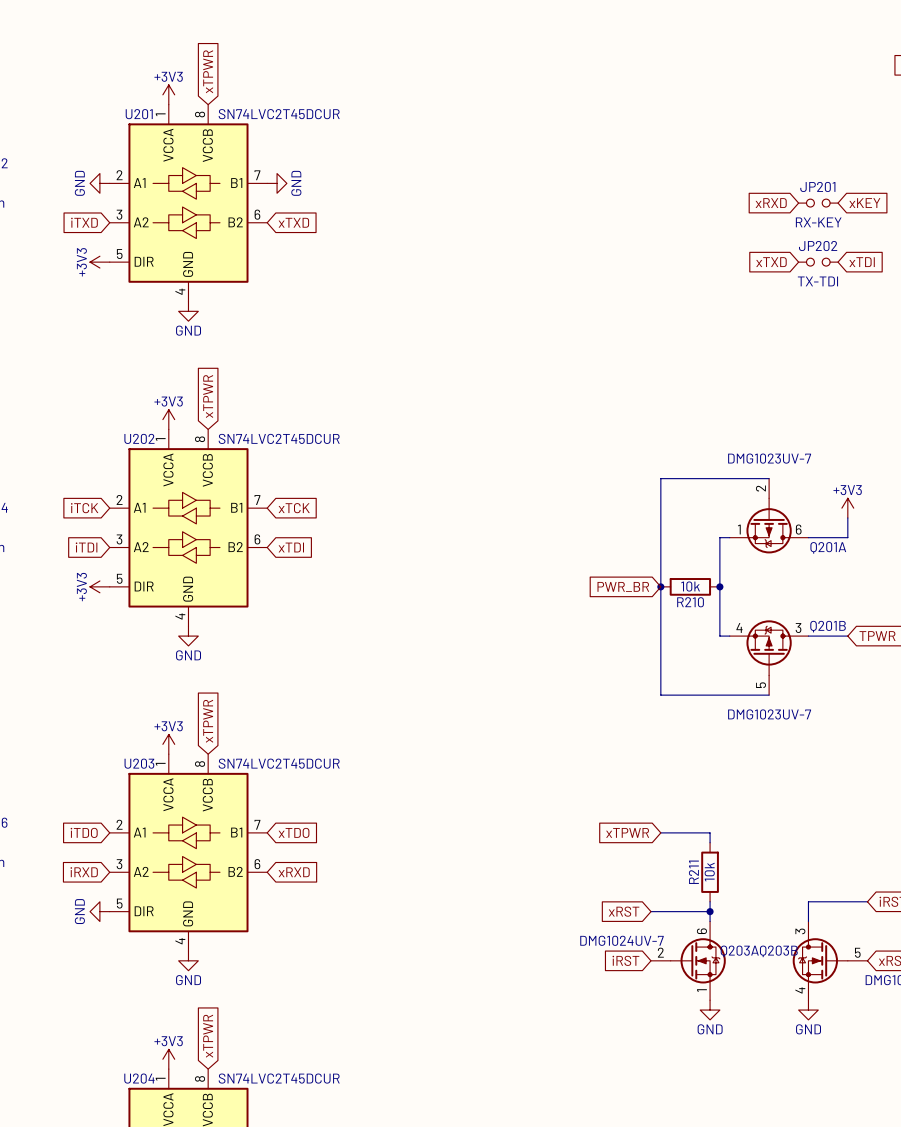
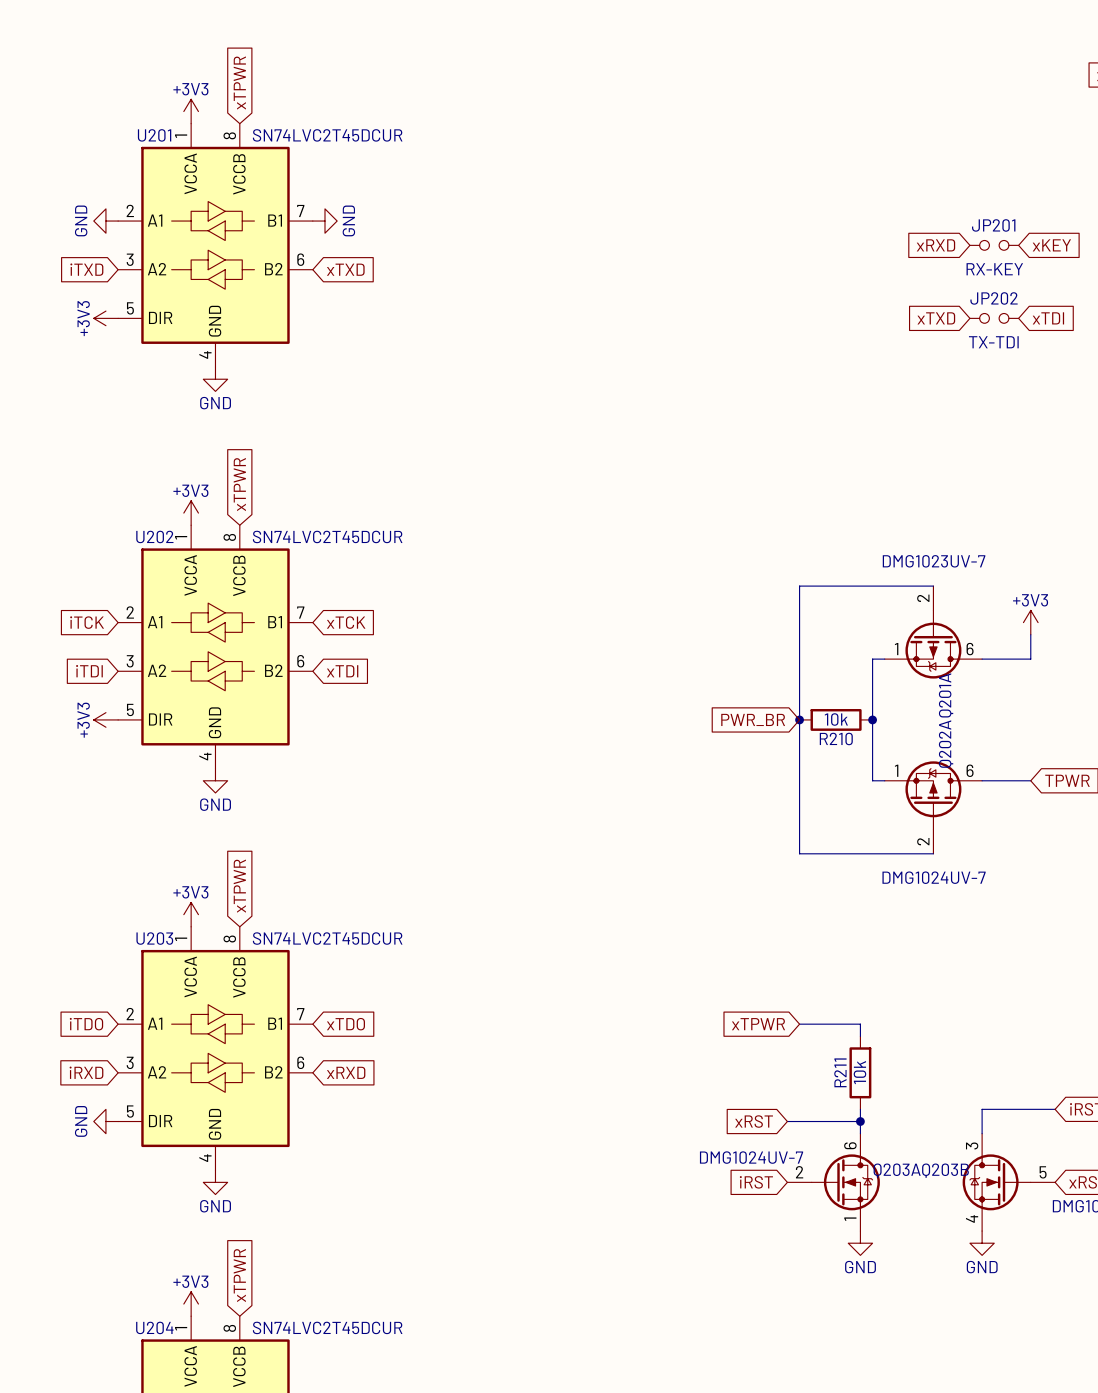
Q201A name rotation: 0° (828, 547) -> 90° counterclockwise (946, 695)
Q201B name: Q201B (828, 626) -> Q202A (946, 744)
Q201B pin number: 4 (739, 627) -> 1 (896, 770)
Q201B pin number: 3 (798, 628) -> 6 (970, 770)
Q201B pin number: 5 (761, 685) -> 2 (923, 841)
Q201B value: DMG1023UV-7 (769, 714) -> DMG1024UV-7 (934, 877)

